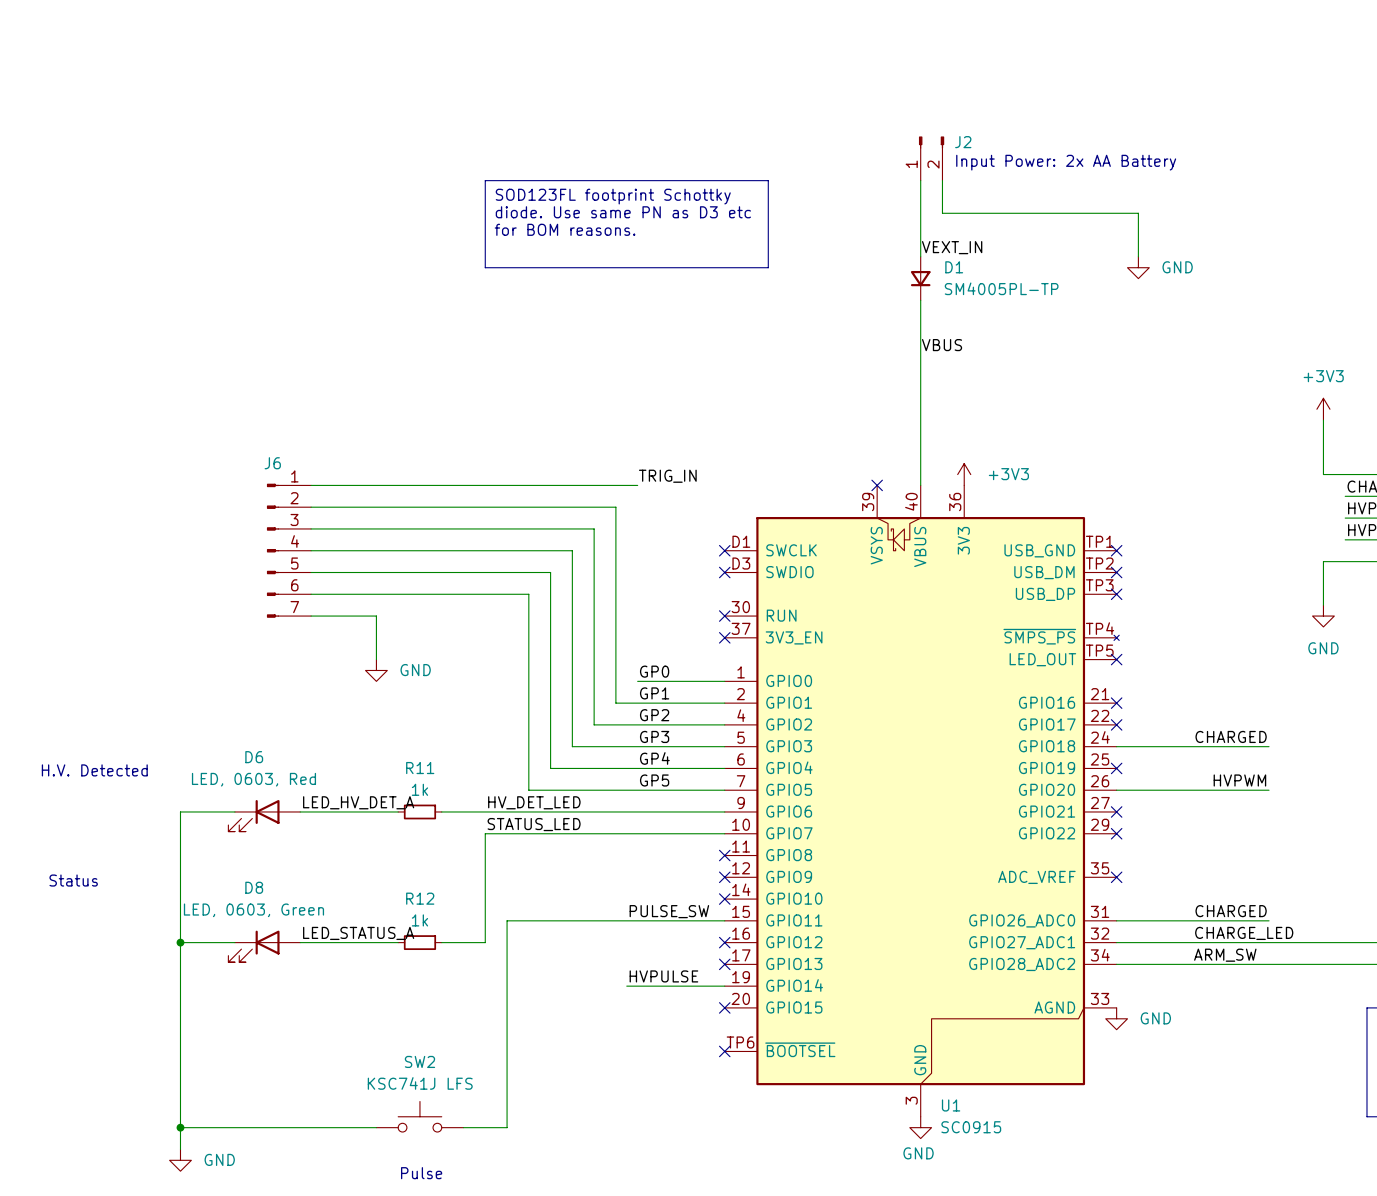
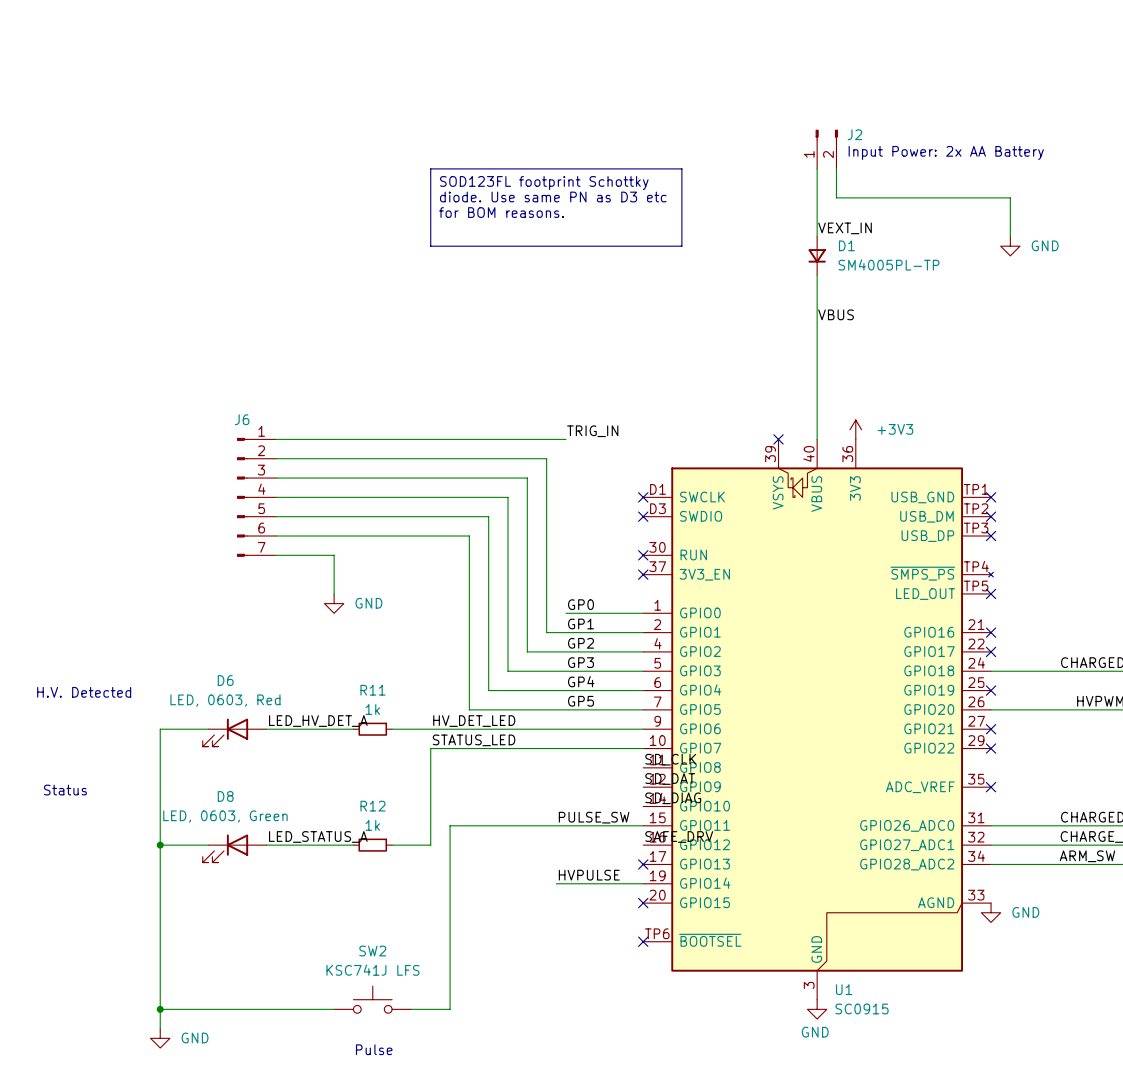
label: none -> SD_CLK (670, 759)
no-connect mark: (724, 855) -> none
label: none -> SD_DAT (670, 779)
no-connect mark: (724, 877) -> none
label: none -> SD_DIAG (673, 798)
no-connect mark: (724, 899) -> none
label: none -> SAFE_DRV (679, 836)
no-connect mark: (724, 942) -> none

